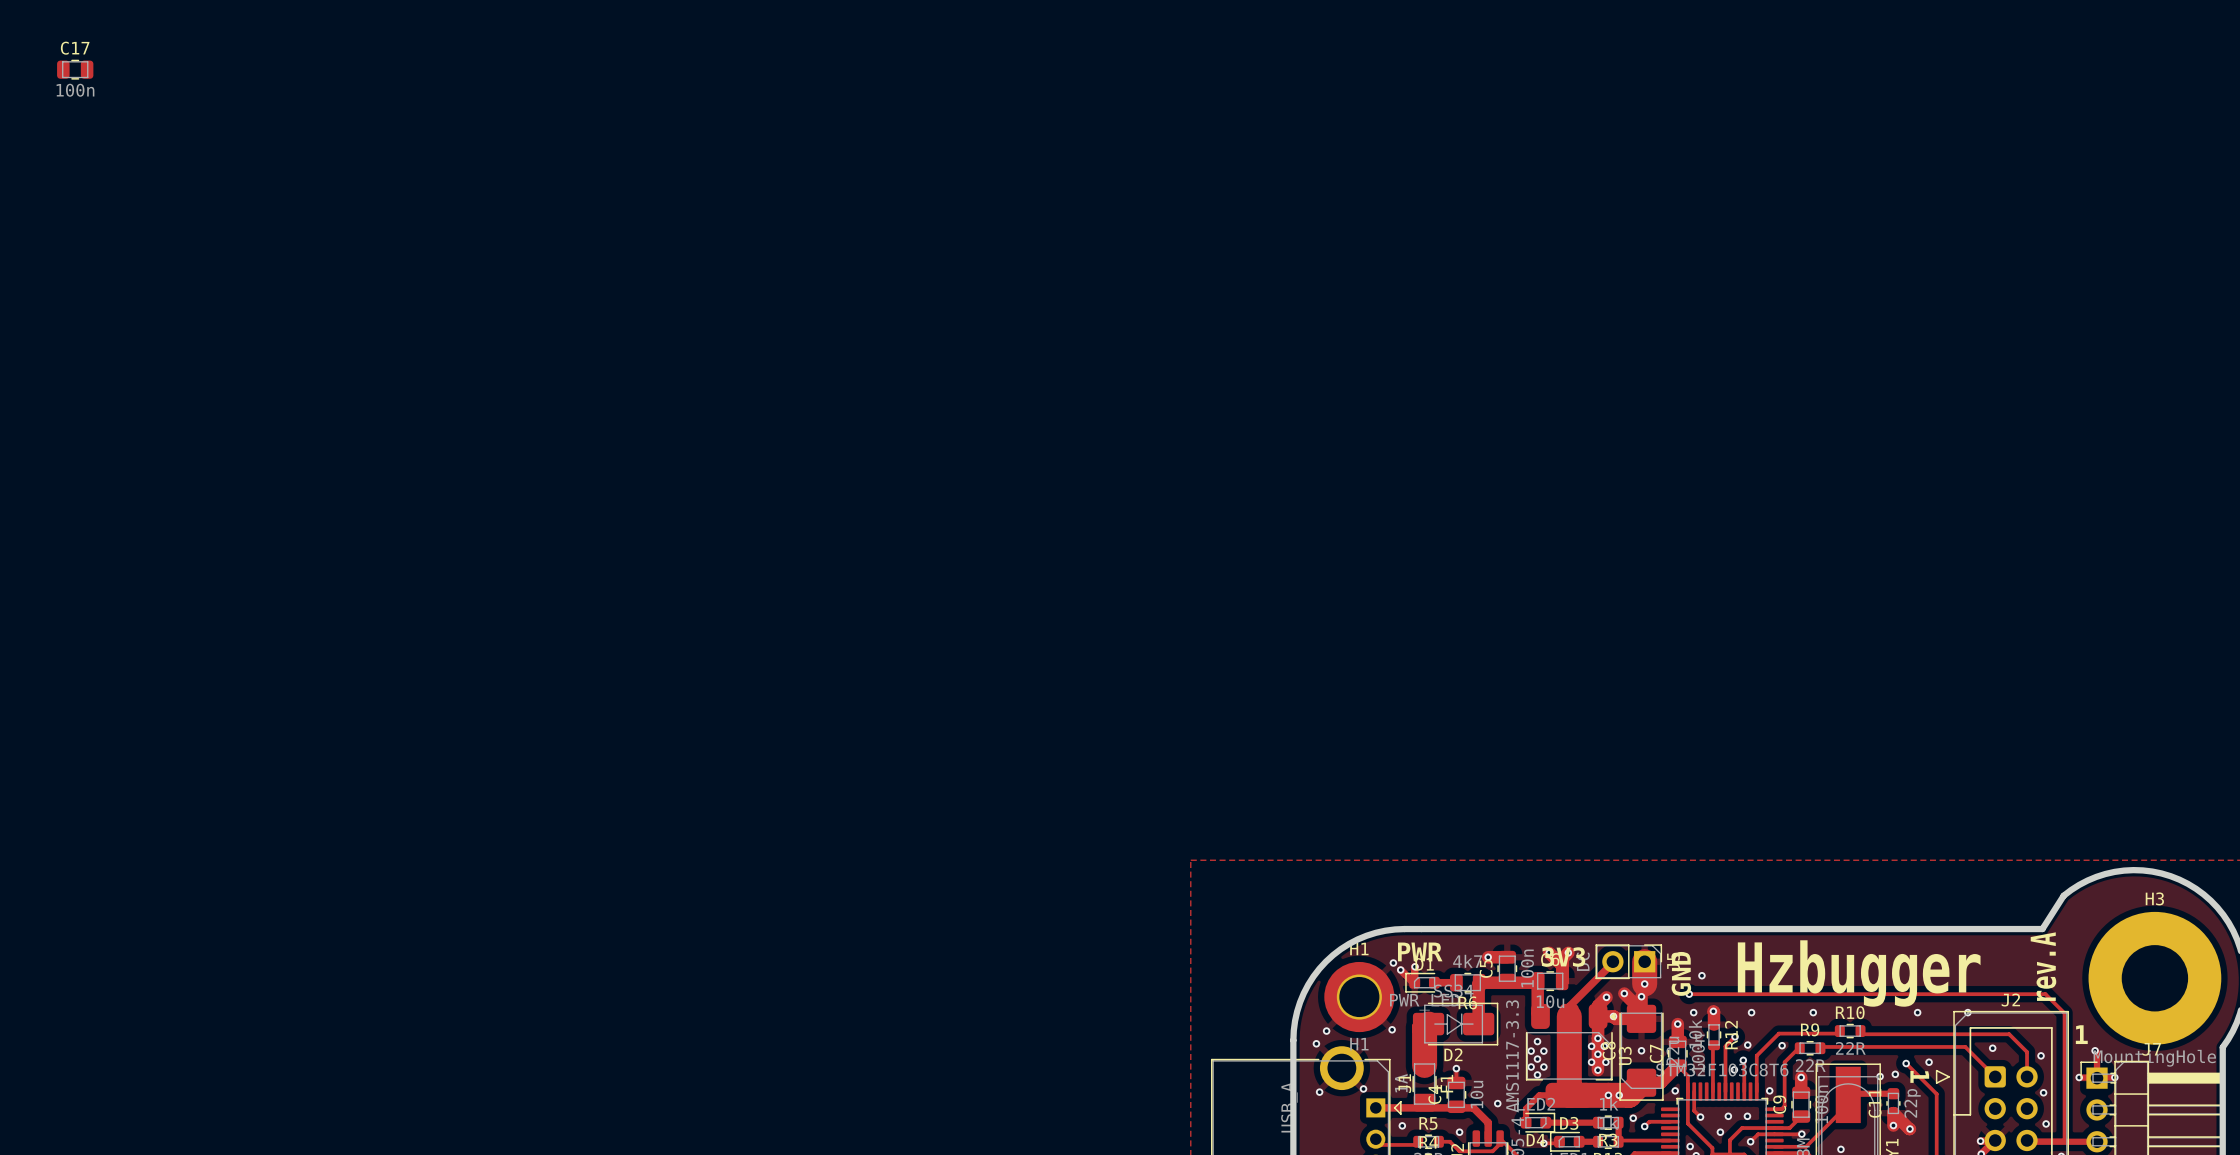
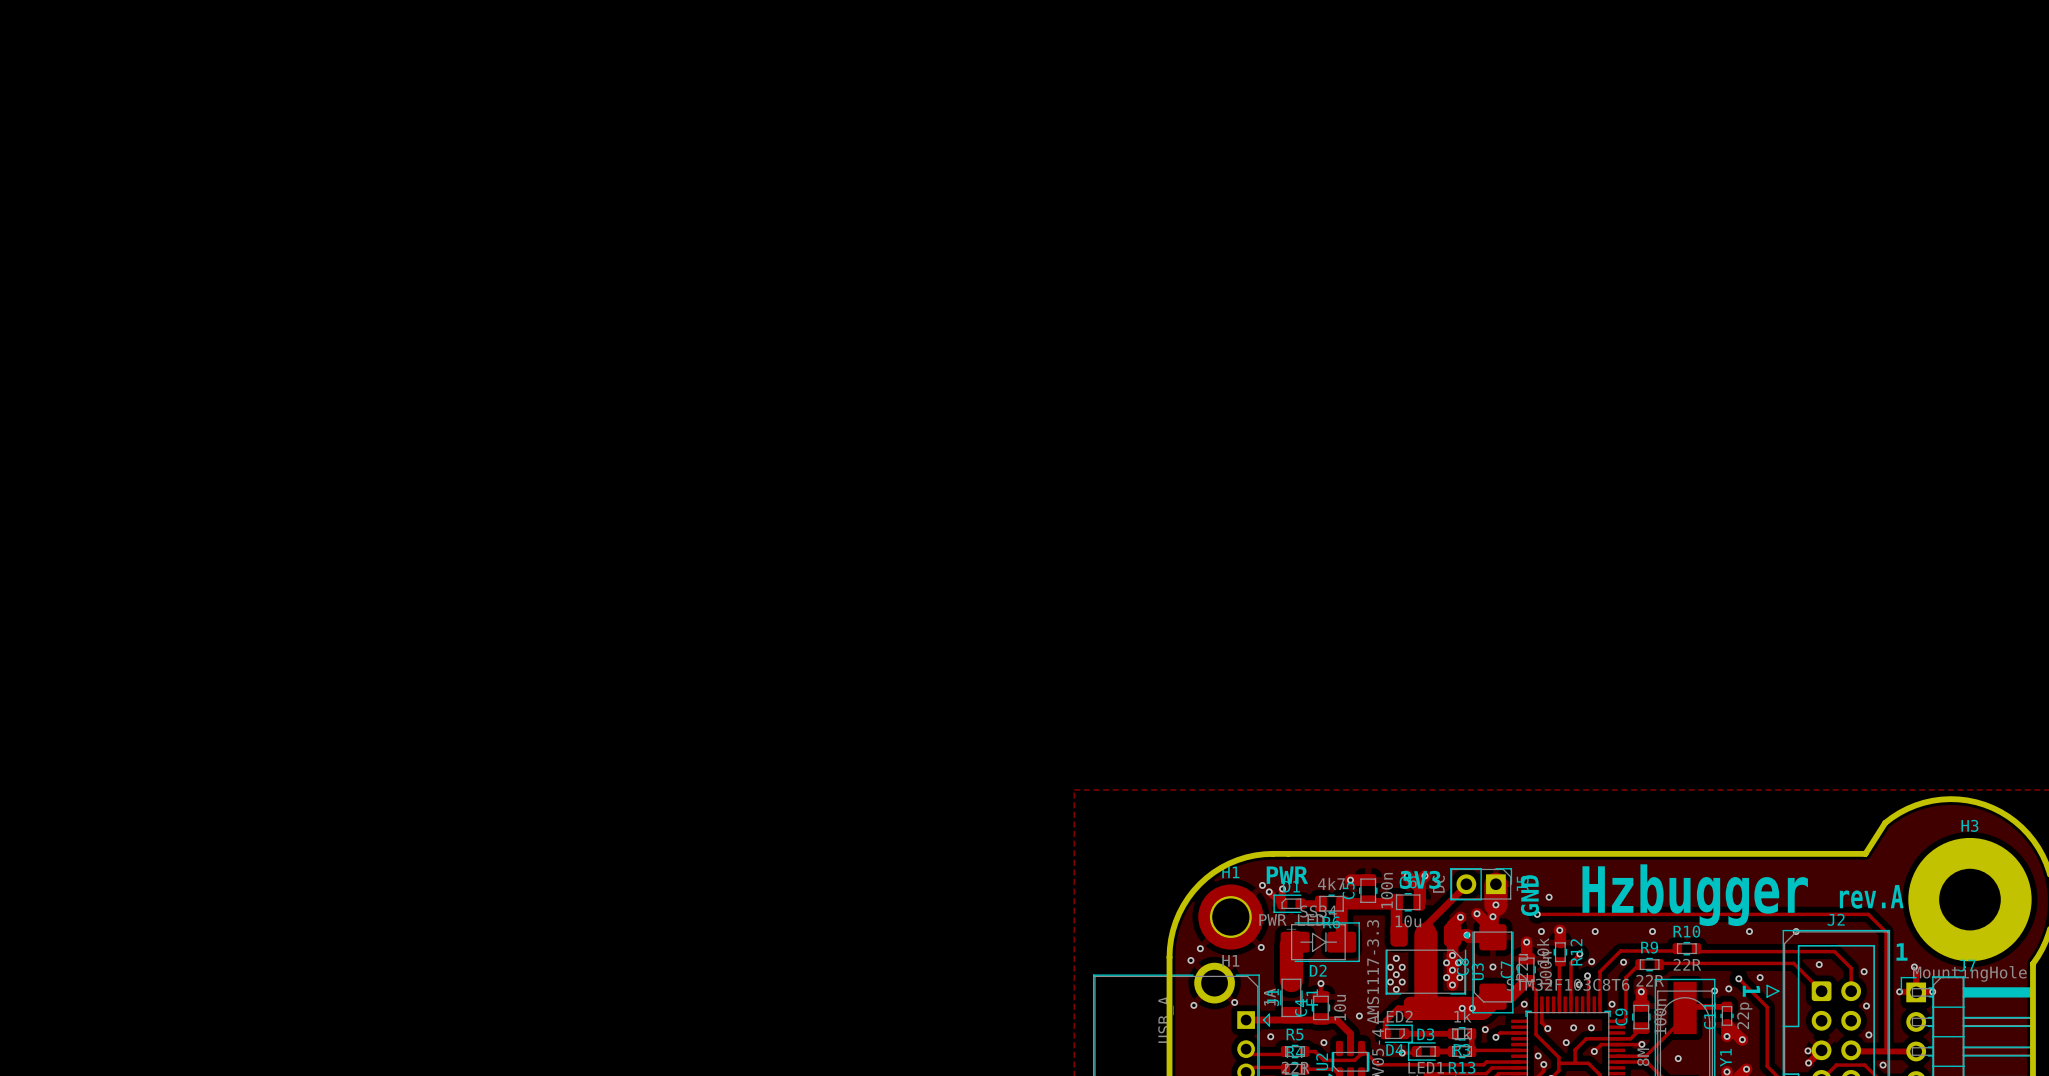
C17: 100n (75, 69) -> none
text rotation: 0° (2043, 966) -> 90° clockwise (1871, 896)

